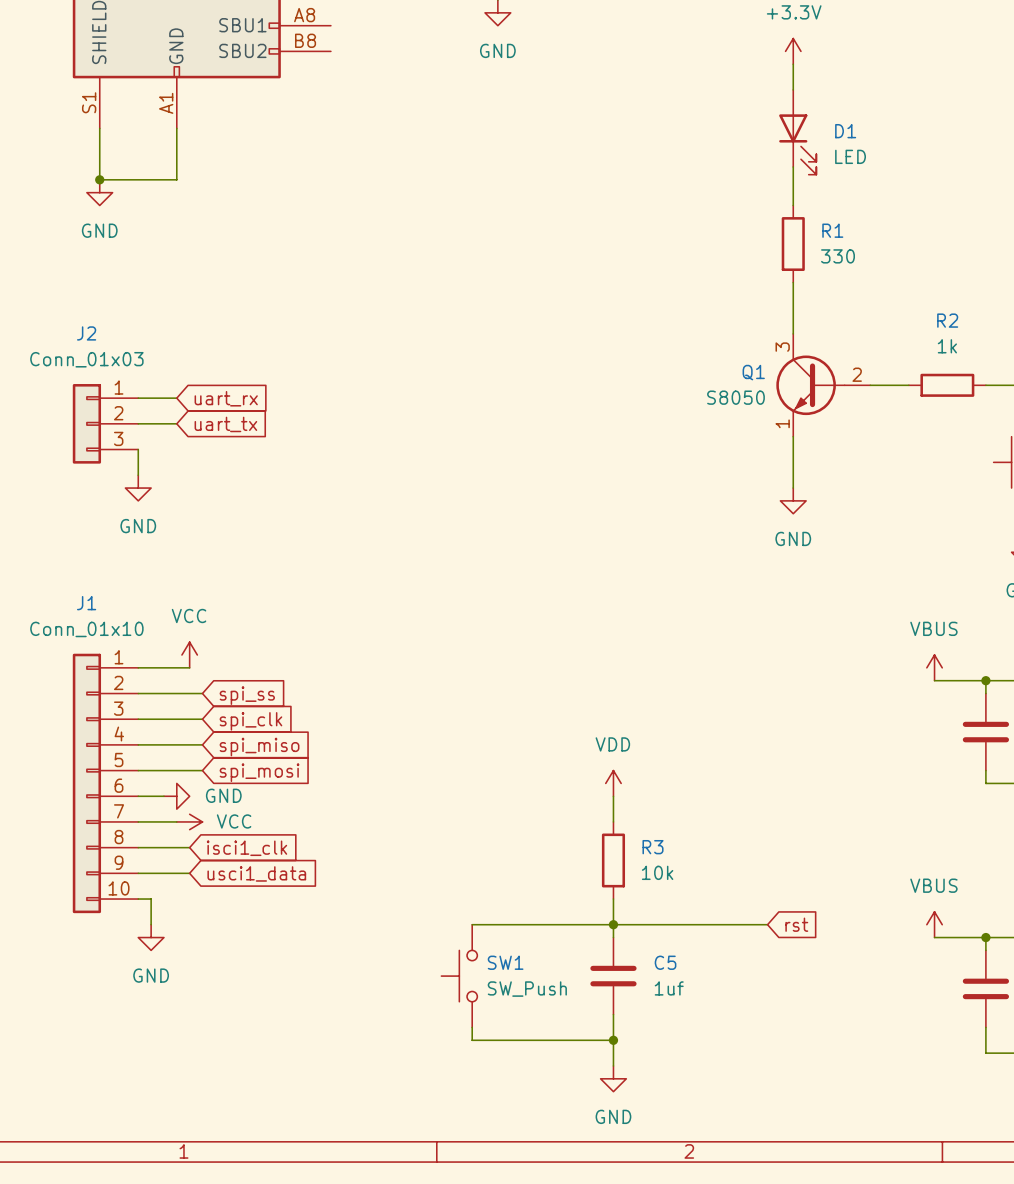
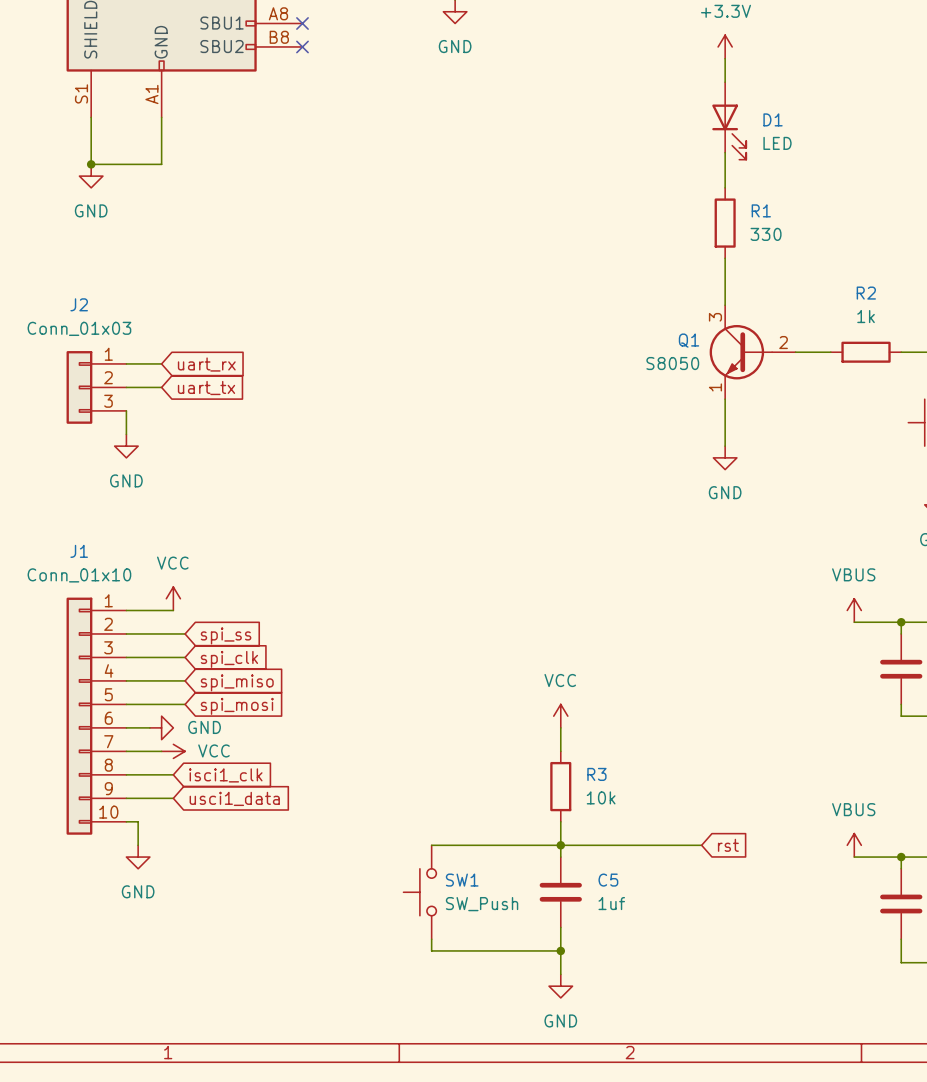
no-connect mark: none -> (302, 23)
no-connect mark: none -> (302, 46)
power symbol: VDD (613, 783) -> VCC (560, 716)

